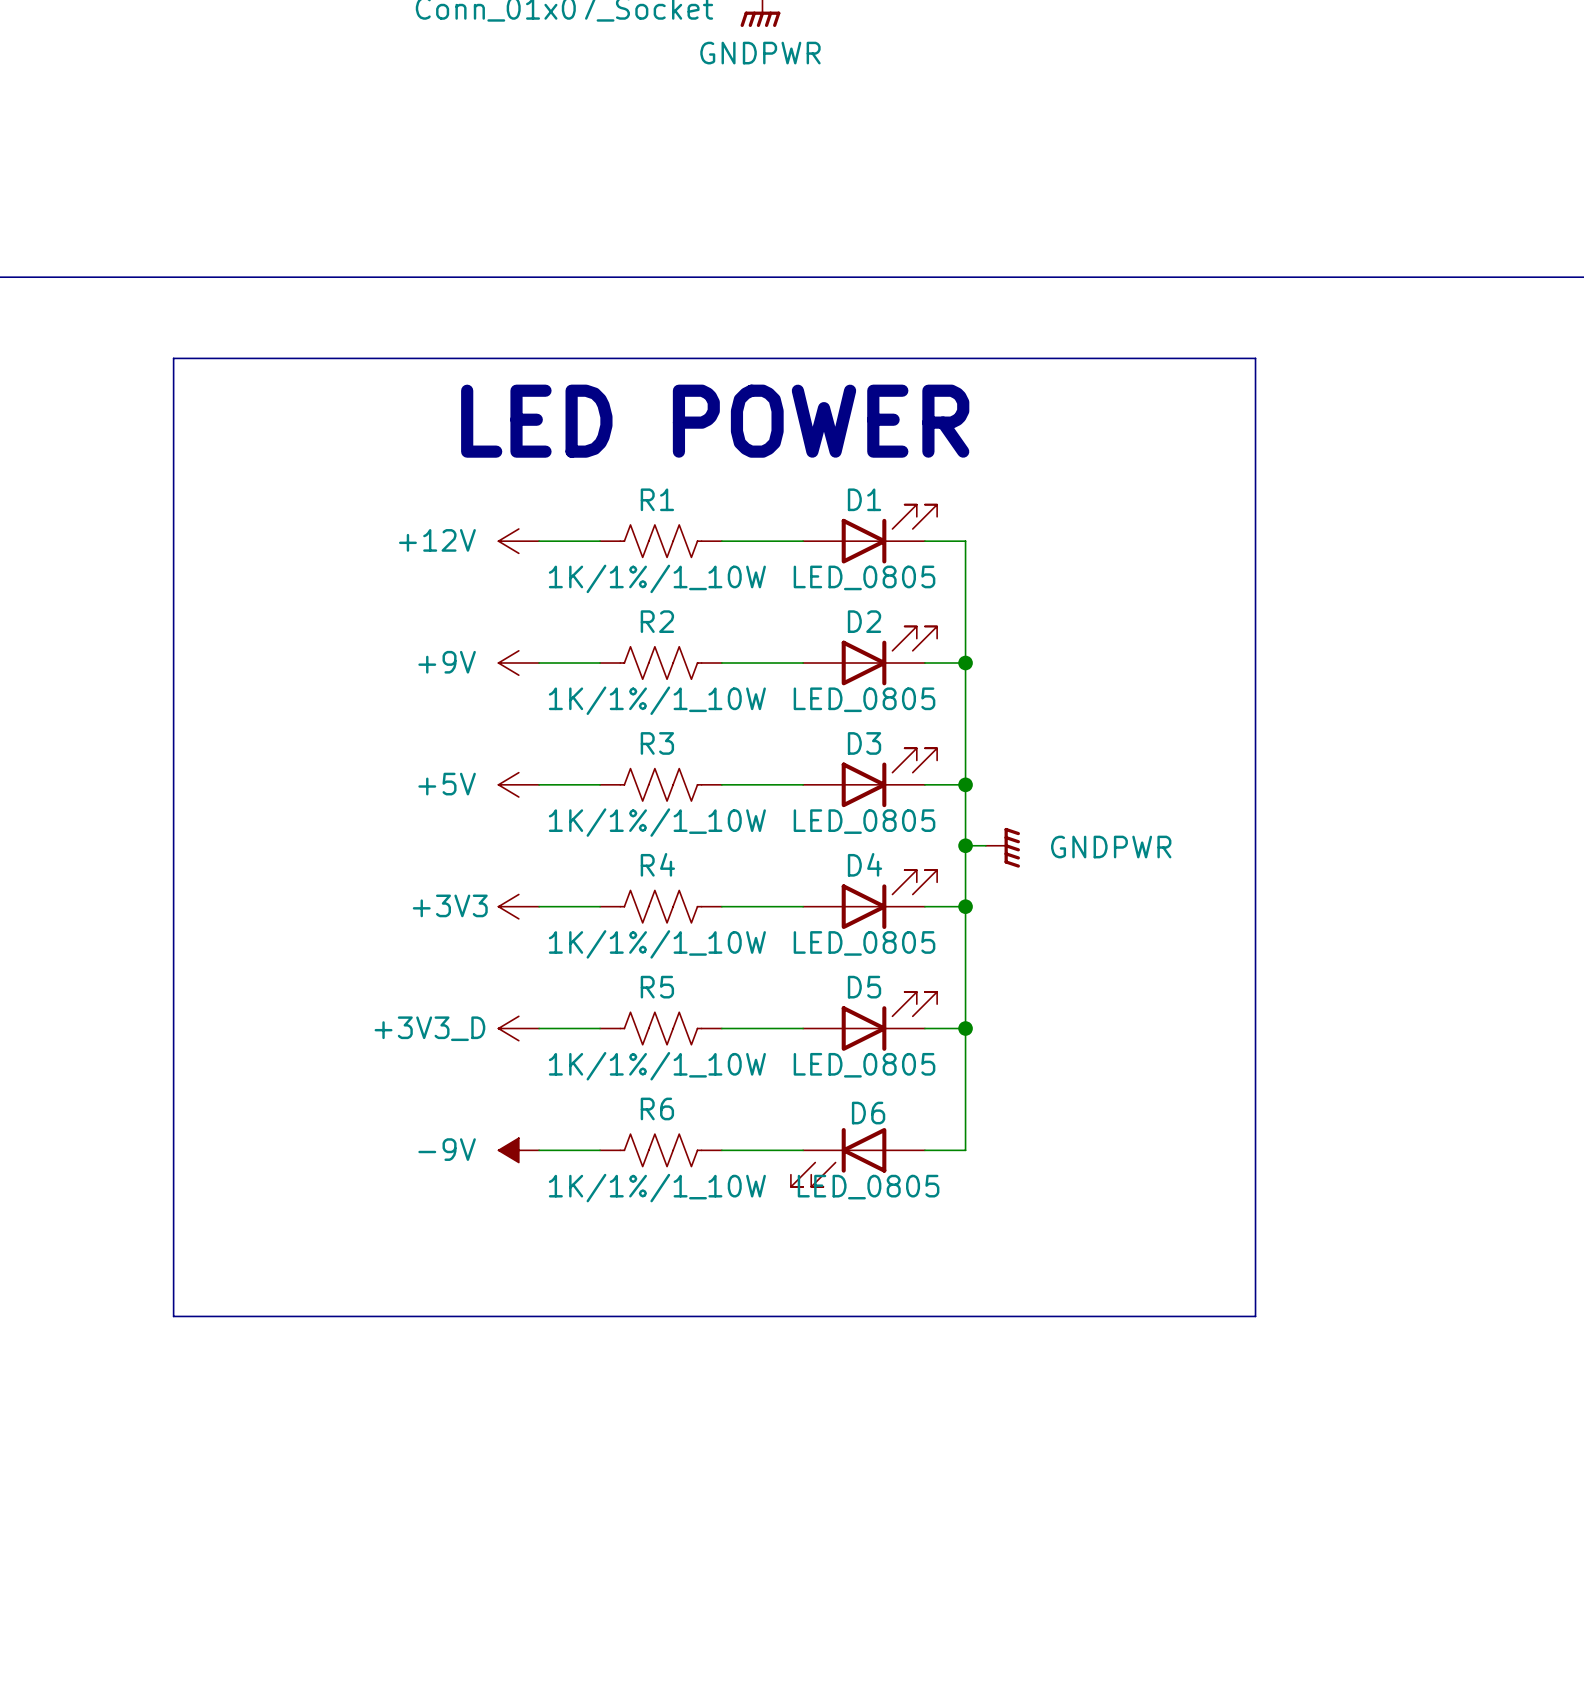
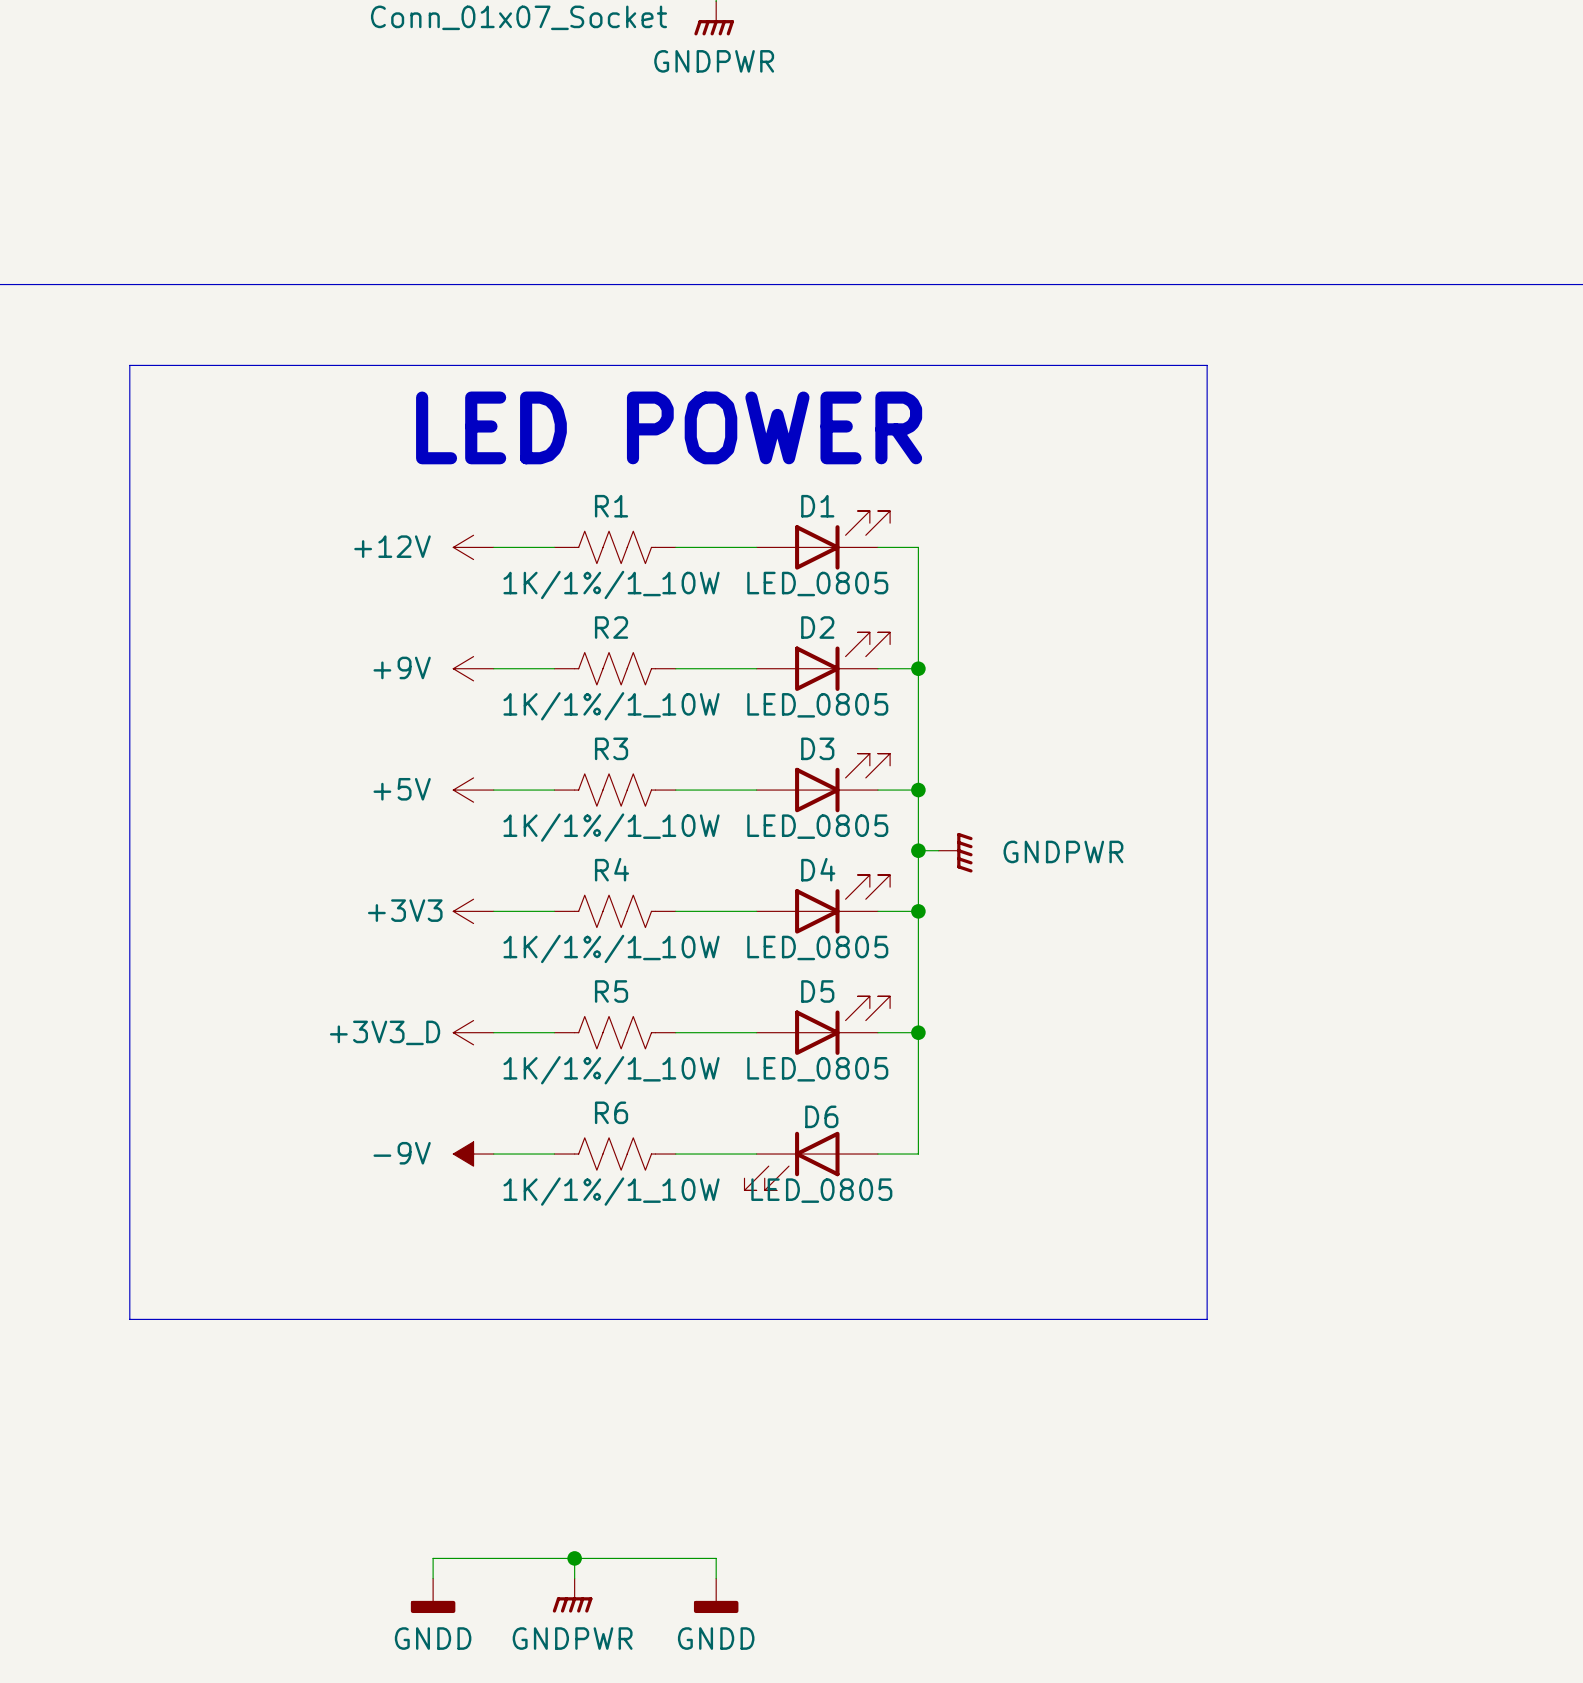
wire: none -> (574, 1558) (574, 1578)
junction: none -> (574, 1558)
wire: none -> (433, 1578) (433, 1558) (716, 1558) (716, 1578)
power symbol: none -> GNDPWR (572, 1595)
power symbol: none -> GNDD (433, 1595)
power symbol: none -> GNDD (716, 1595)

